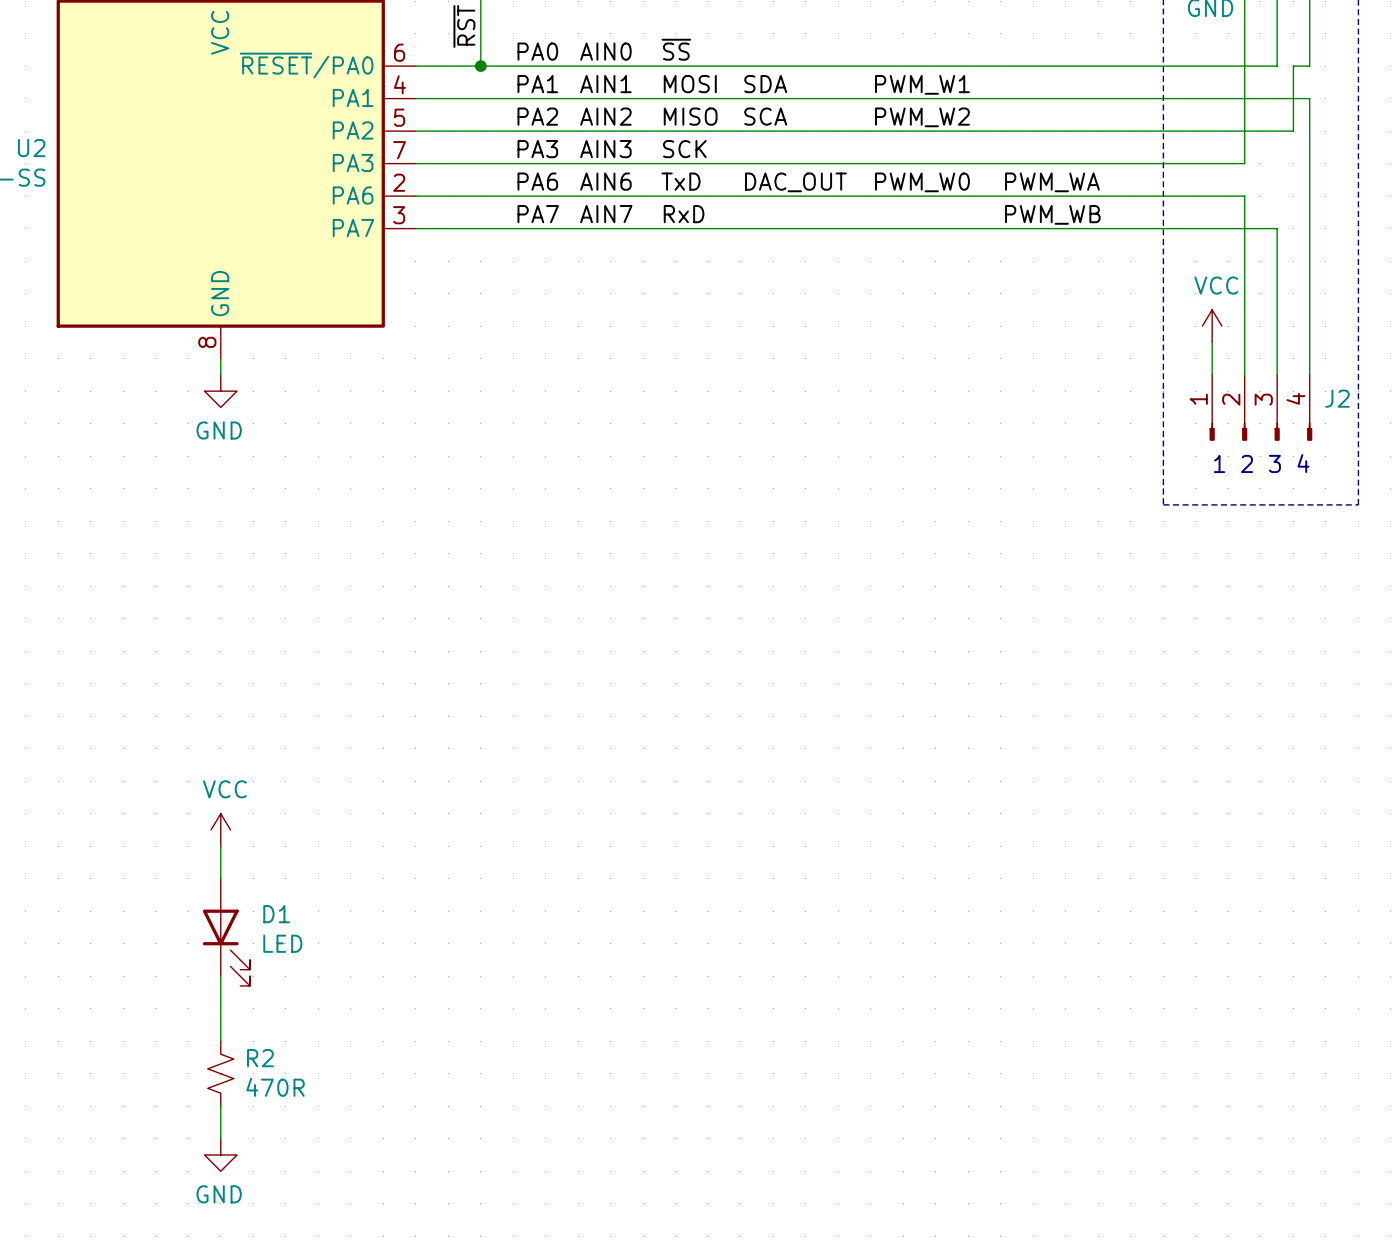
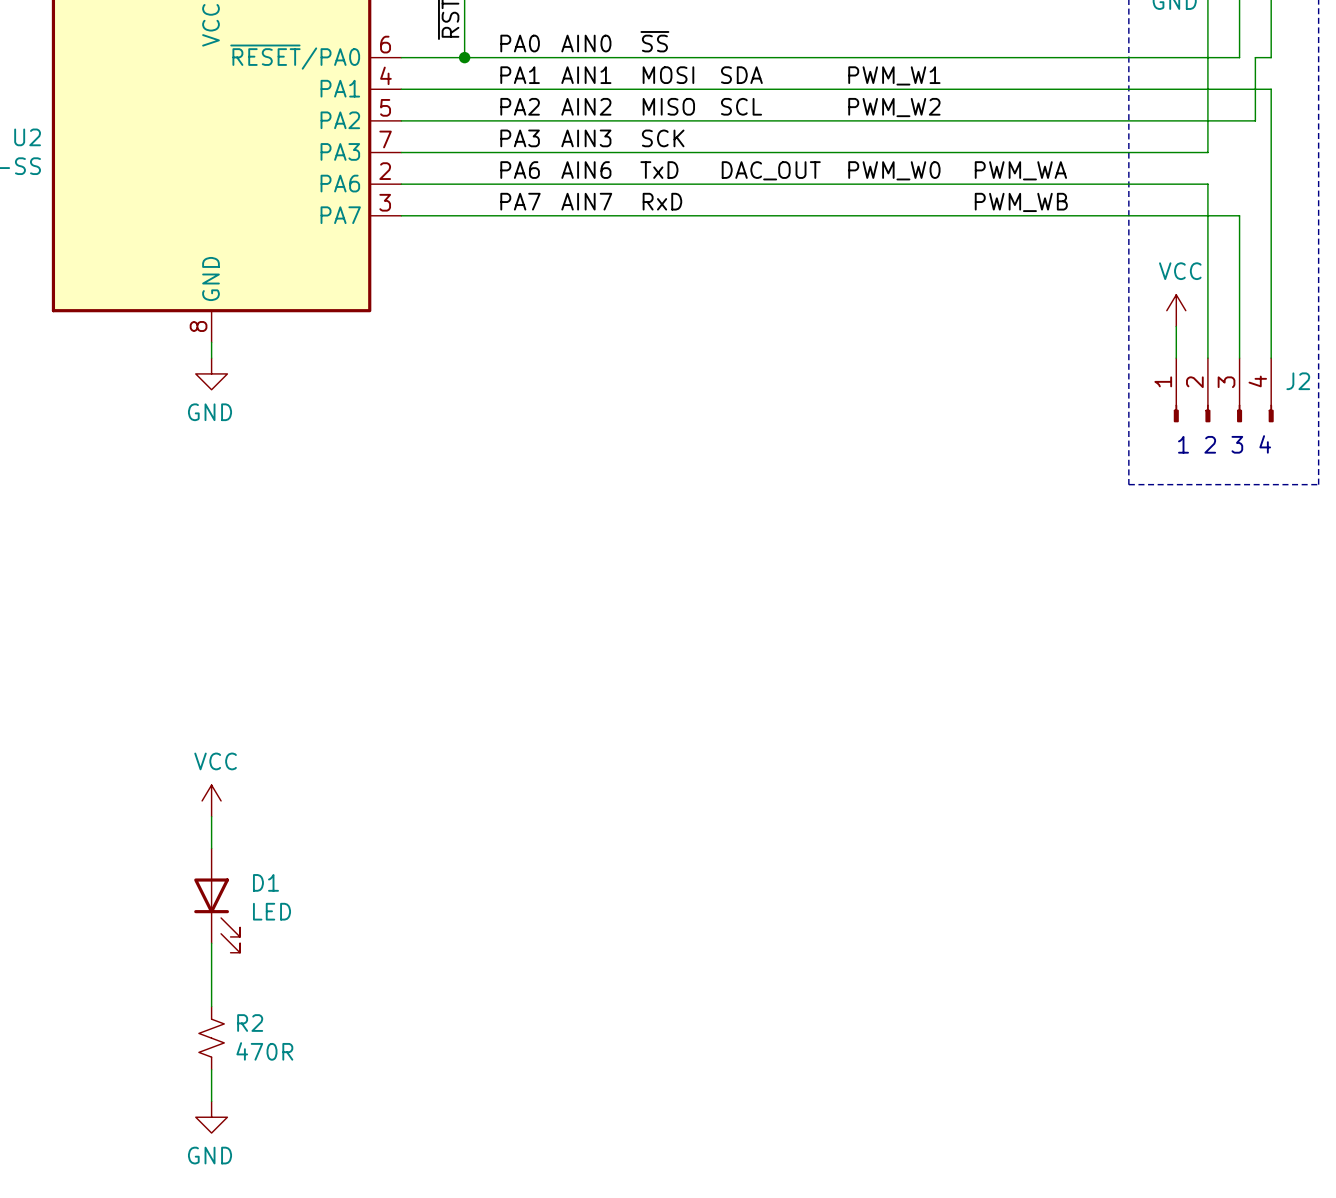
label: SCA (765, 116) -> SCL (741, 106)

